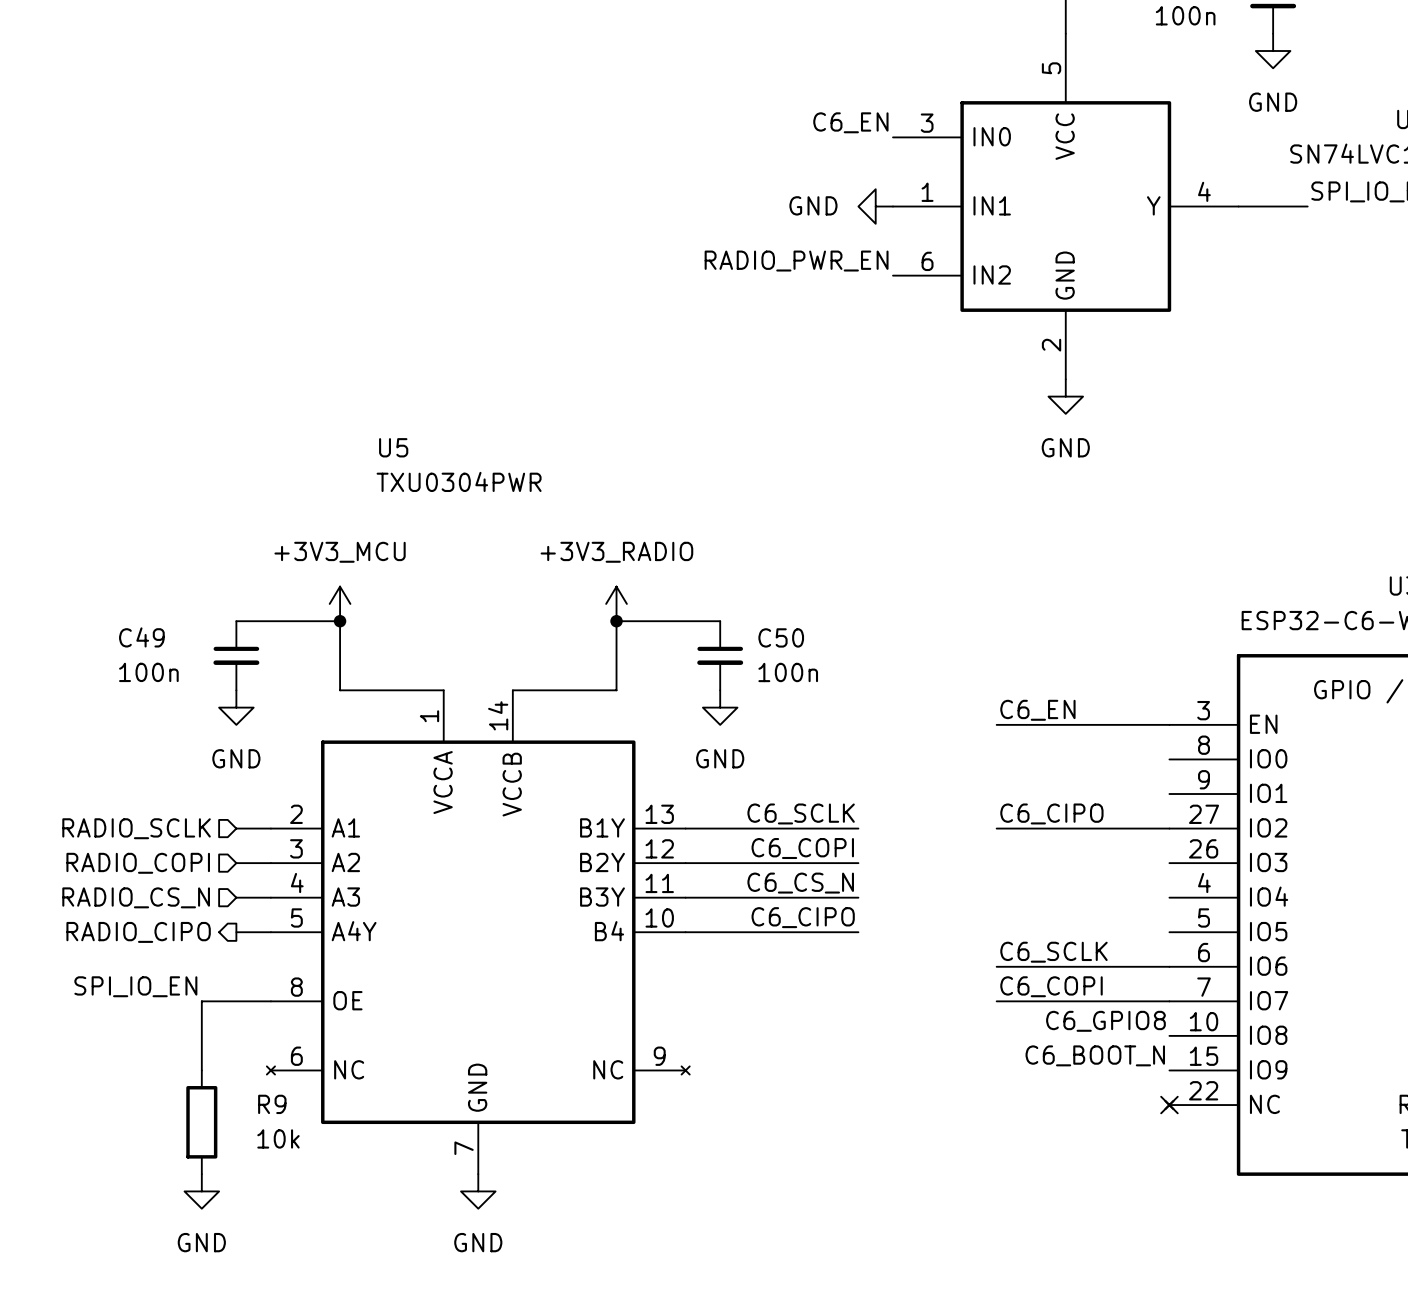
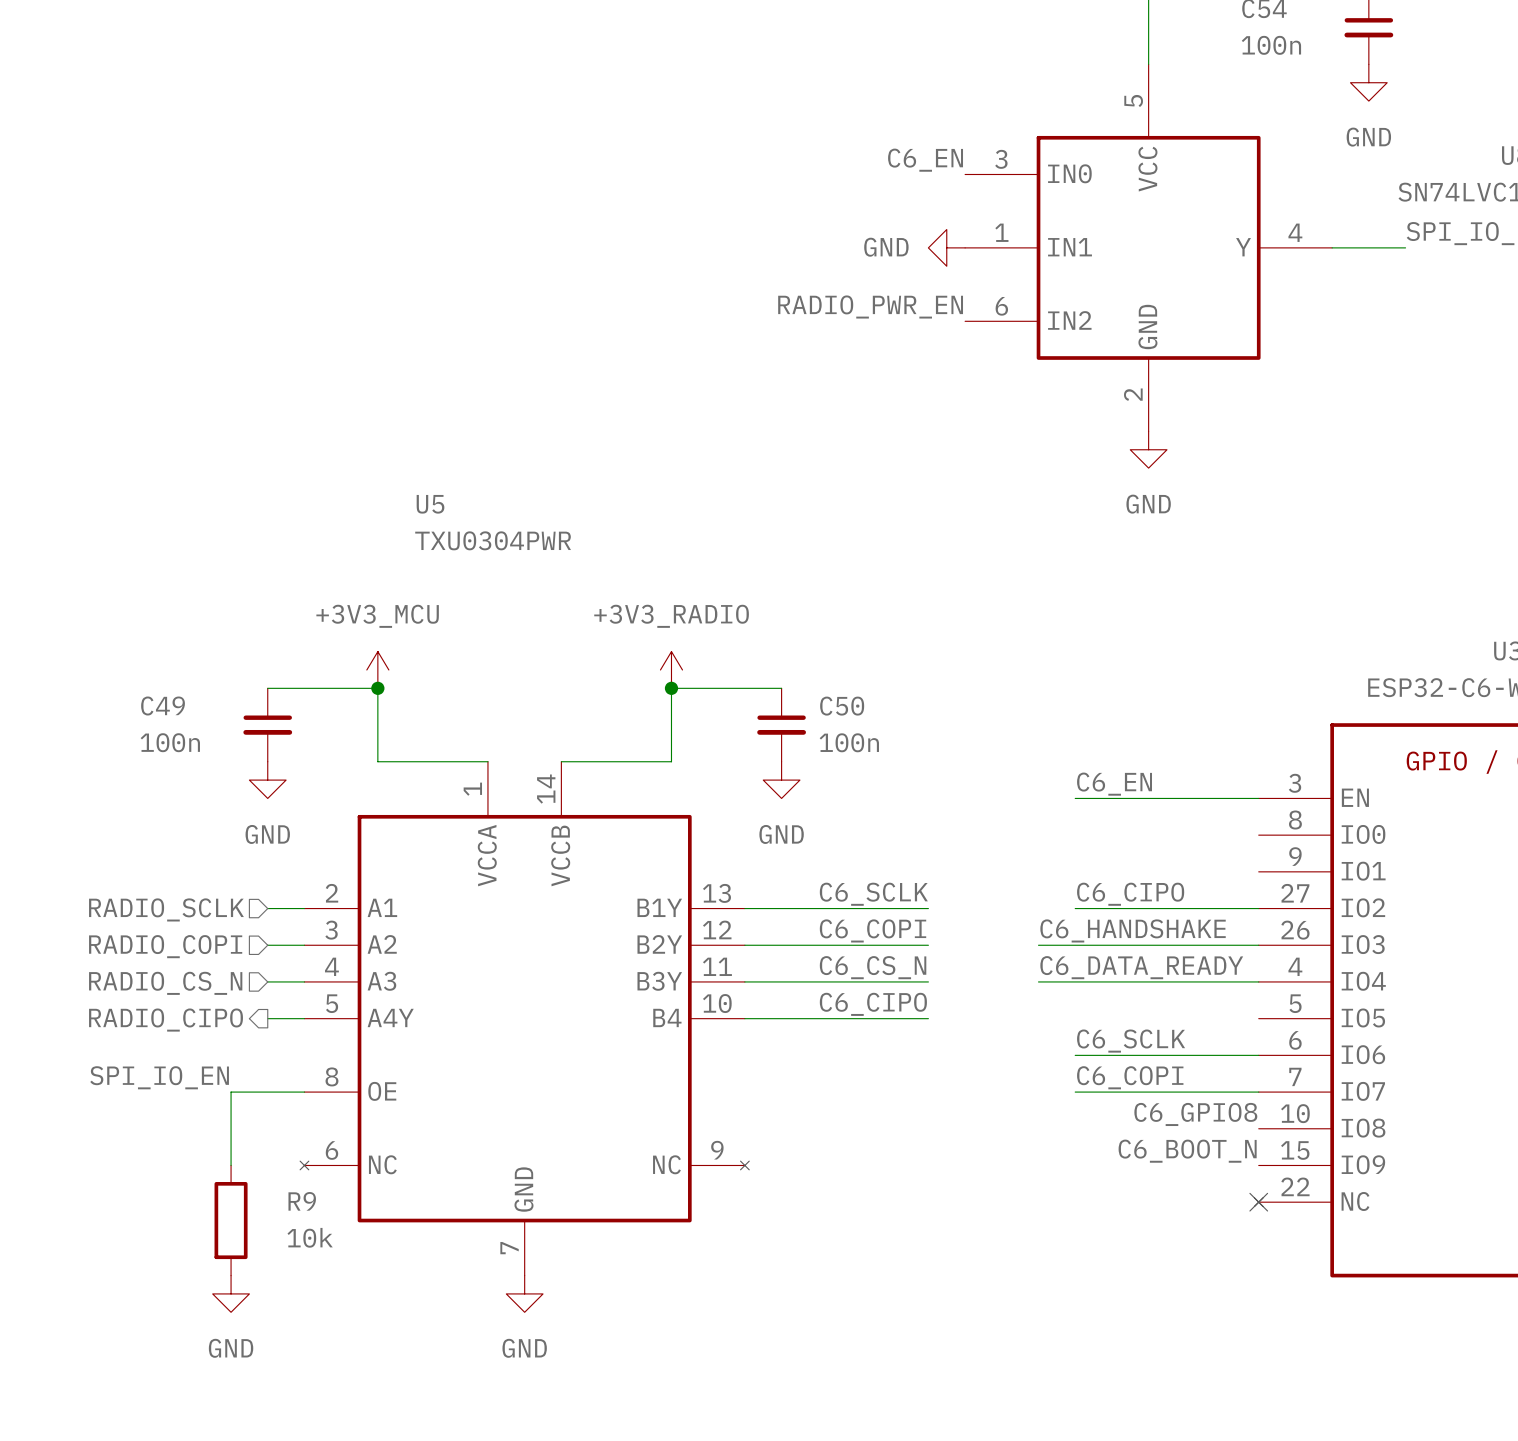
label: none -> C6_HANDSHAKE (1133, 930)
wire: none -> (1038, 945) (1258, 945)
label: none -> C6_DATA_READY (1141, 967)
wire: none -> (1038, 981) (1258, 981)

